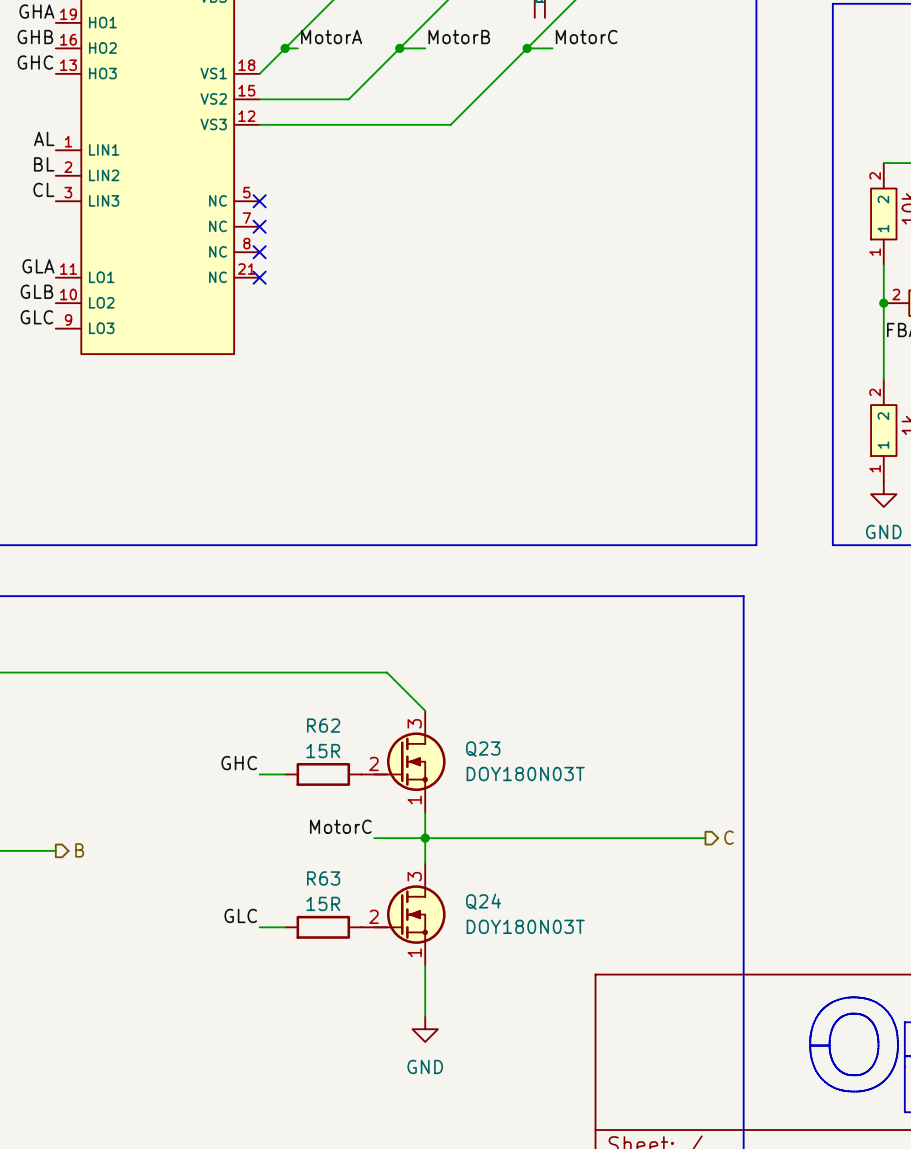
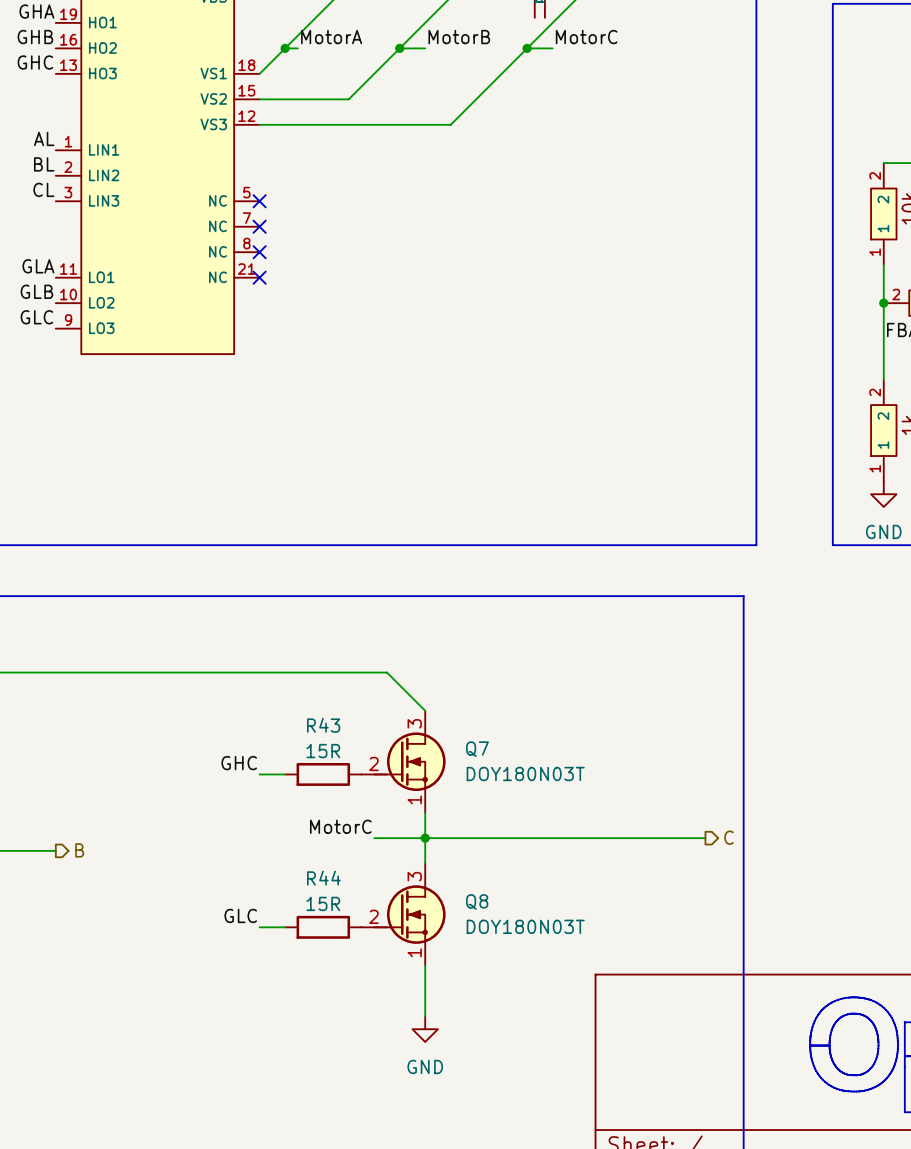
R62 name: R62 (323, 725) -> R43 (323, 725)
Q23 name: Q23 (483, 749) -> Q7 (477, 749)
R63 name: R63 (323, 878) -> R44 (323, 878)
Q24 name: Q24 (483, 901) -> Q8 (477, 901)

